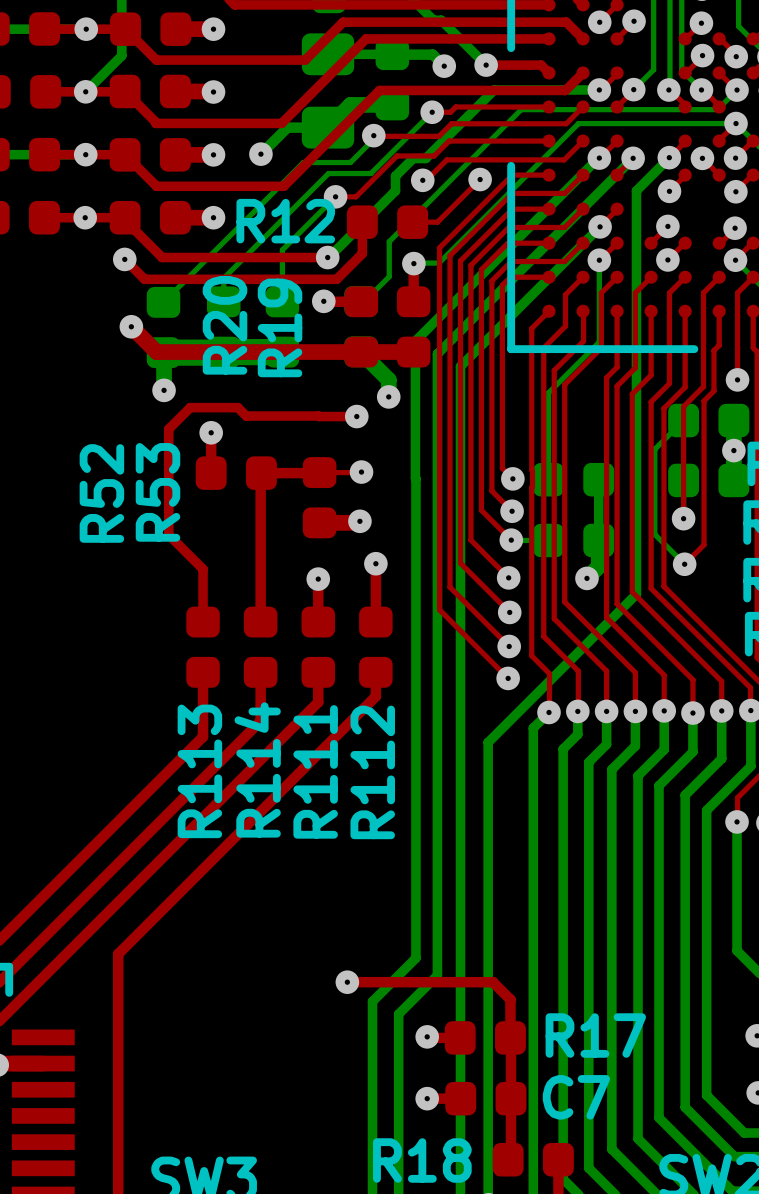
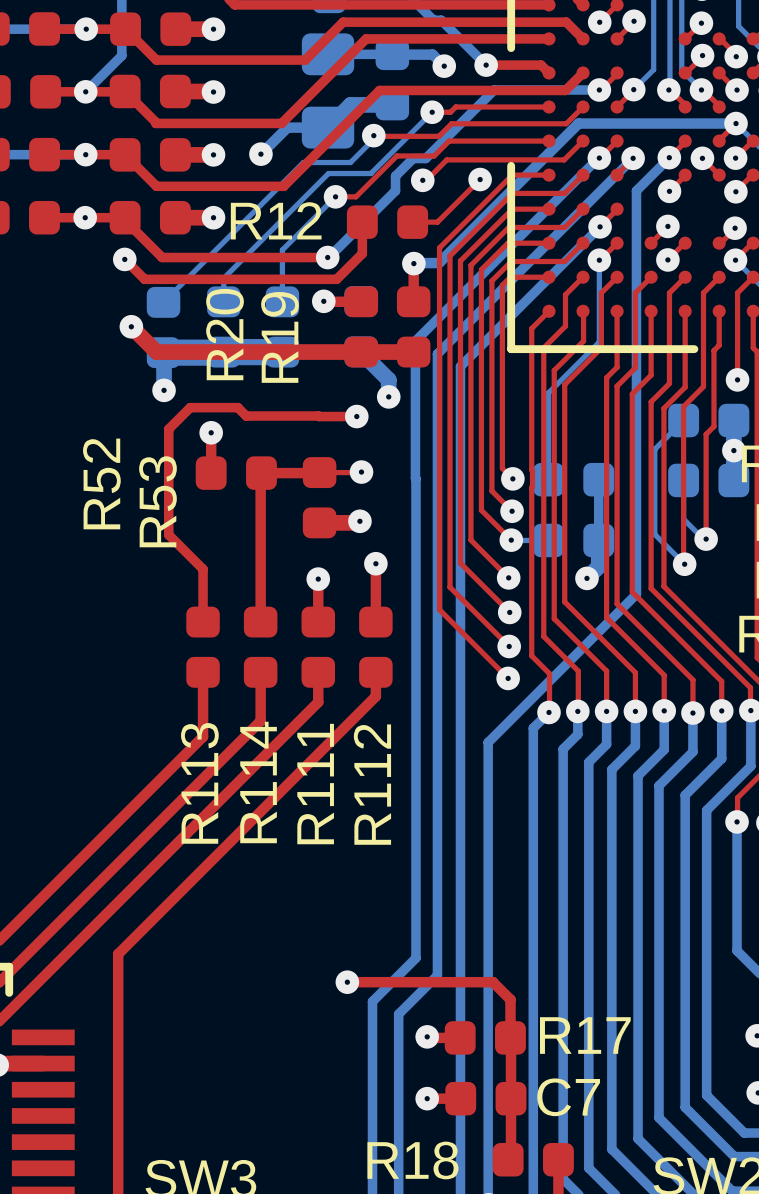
bottom track: (737, 90) (717, 109) (521, 109) (389, 241) (389, 276) (364, 301) -> none
bottom track width: thin (736, 123) (578, 123) (439, 263) (414, 263) -> thick (736, 123) (578, 123) (439, 263) (414, 263)
top track: (713, 391) (704, 400) (704, 544) (684, 564) -> (713, 391) (713, 426) (706, 434) (706, 539)
top track: none -> (683, 518) (684, 564)
via position: (683, 518) -> (706, 539)
bottom track: none -> (683, 519) (703, 539) (706, 539)

